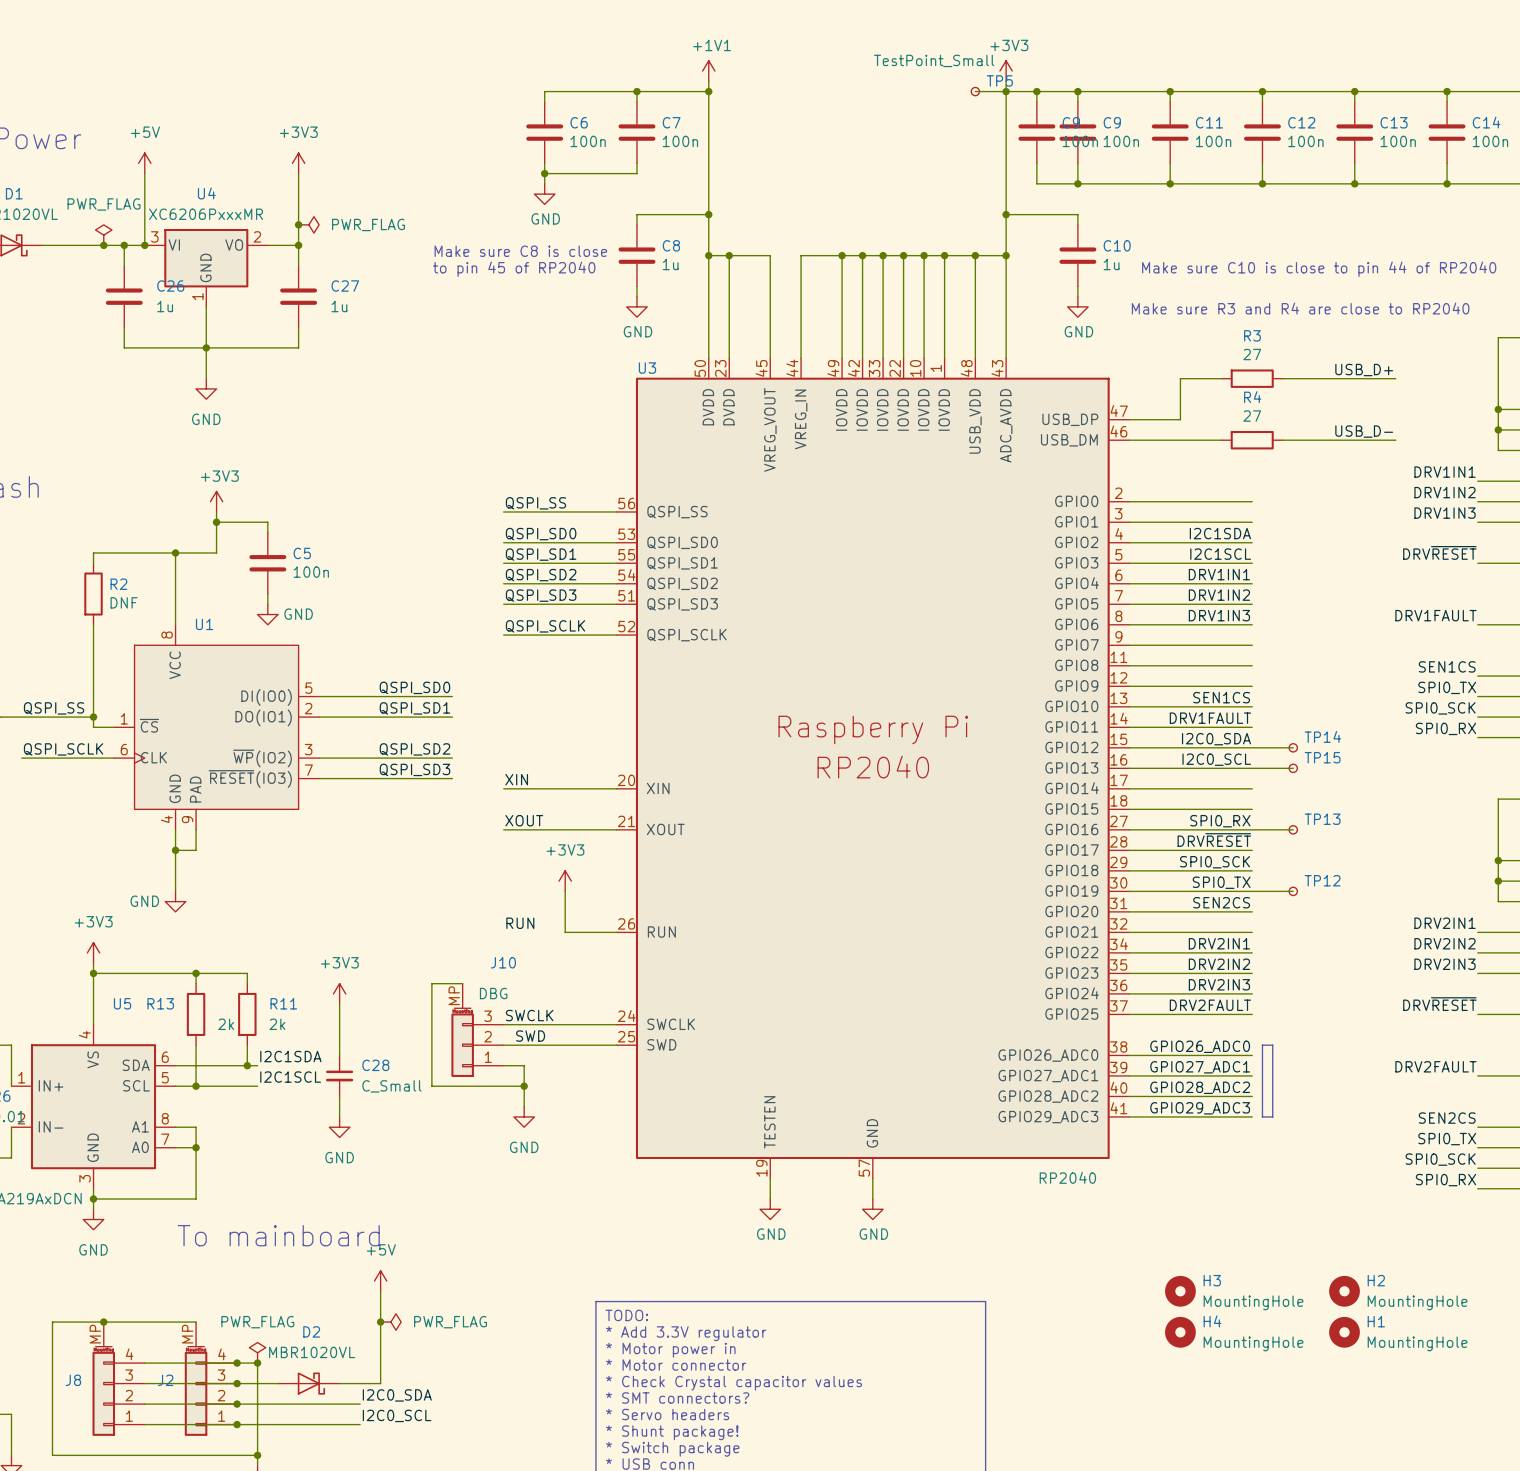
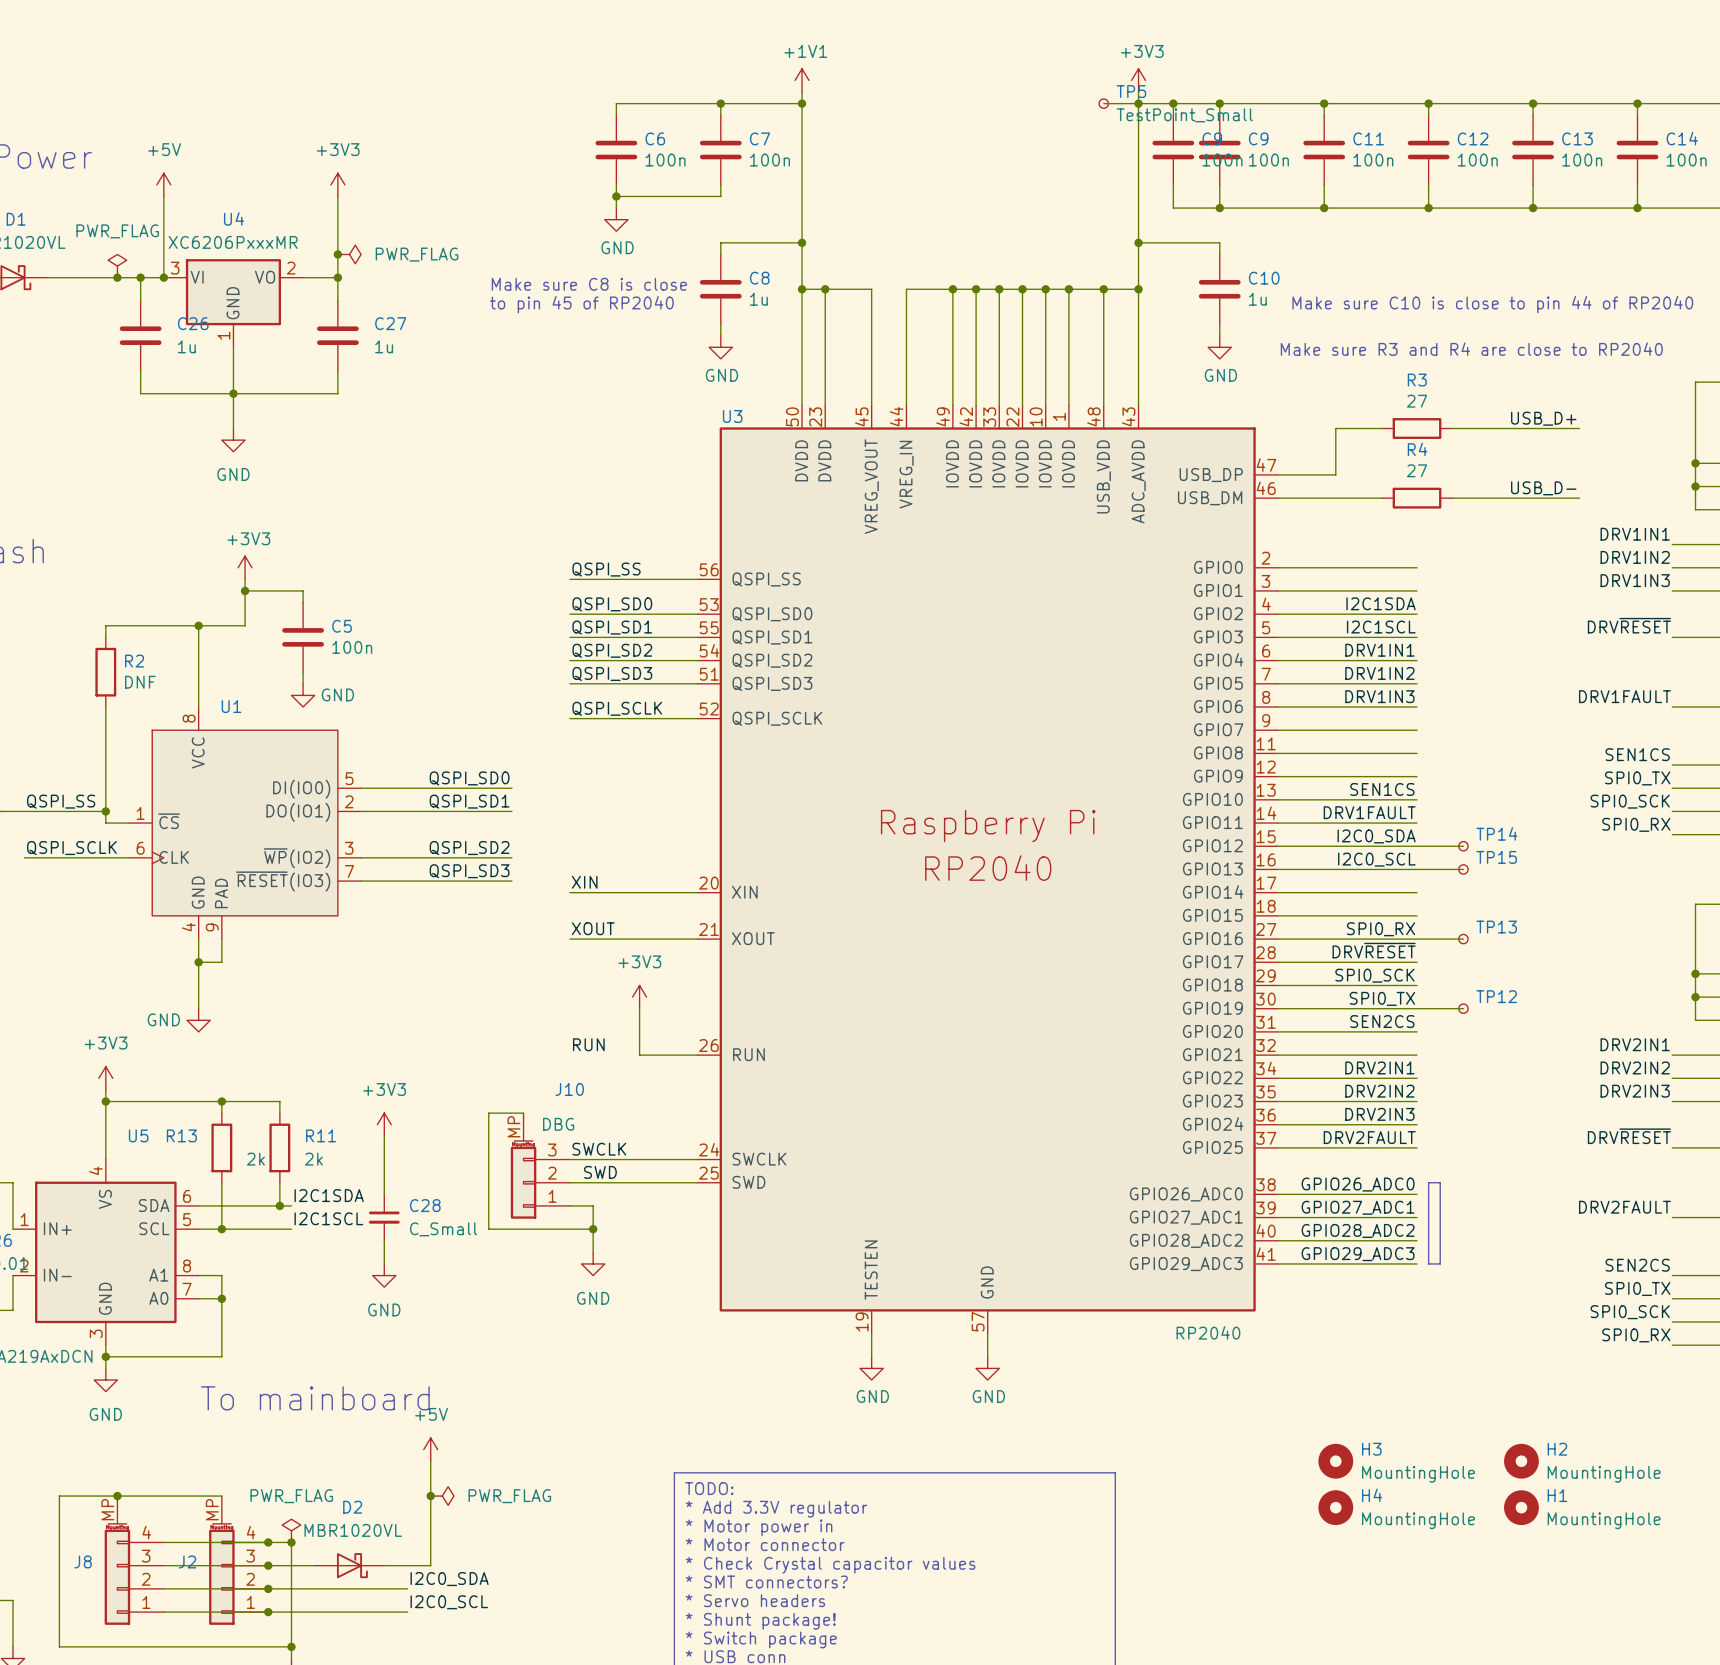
TP5 value position: TestPoint_Small (934, 60) -> TestPoint_Small (1184, 115)

